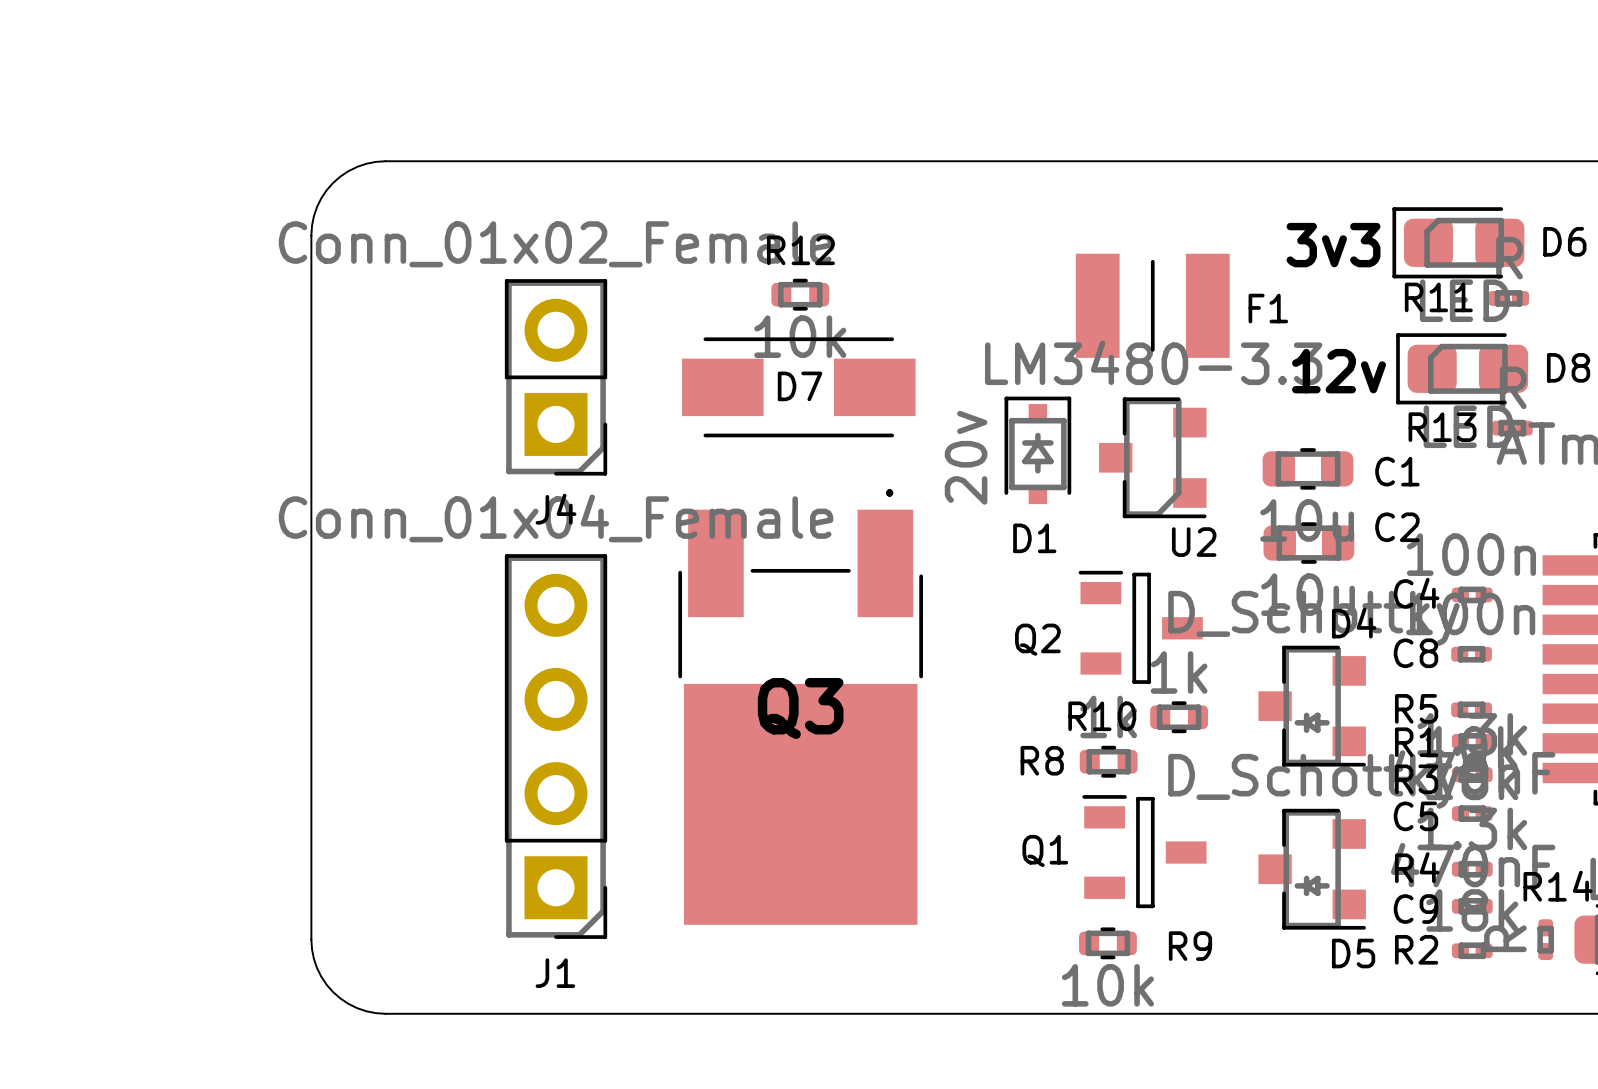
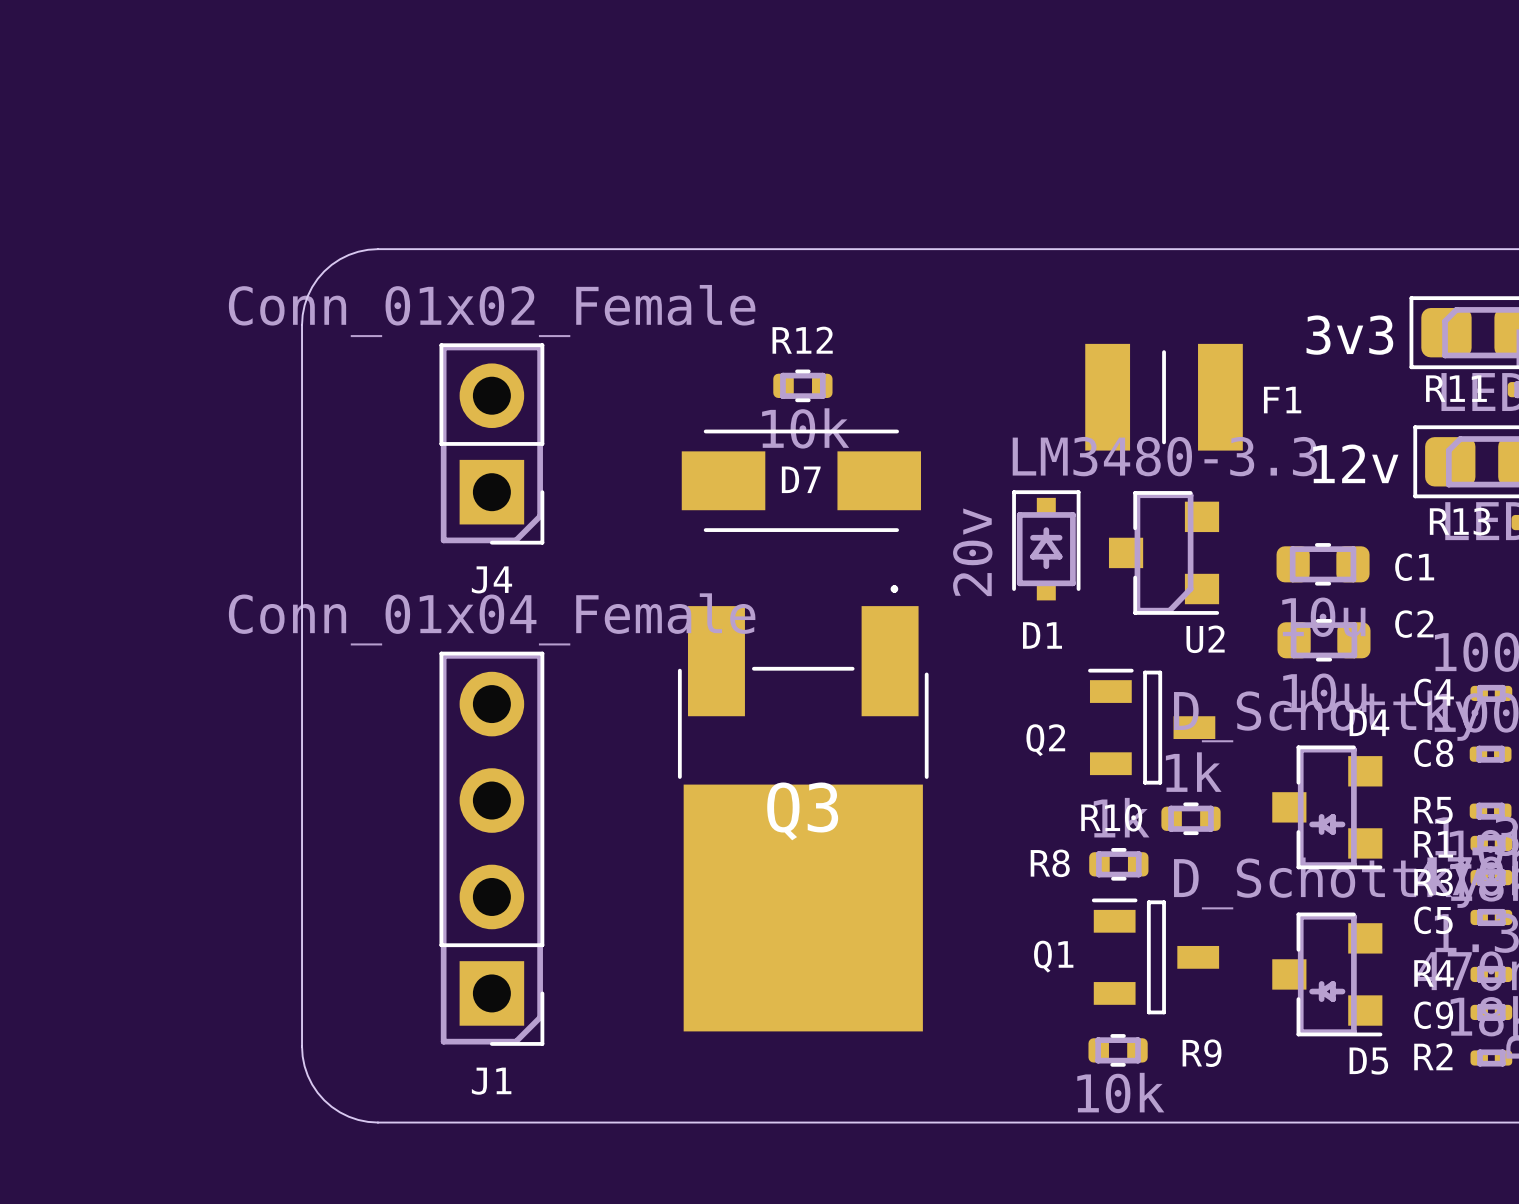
J4 position: (556, 377) -> (491, 443)
J1 position: (556, 746) -> (491, 848)

